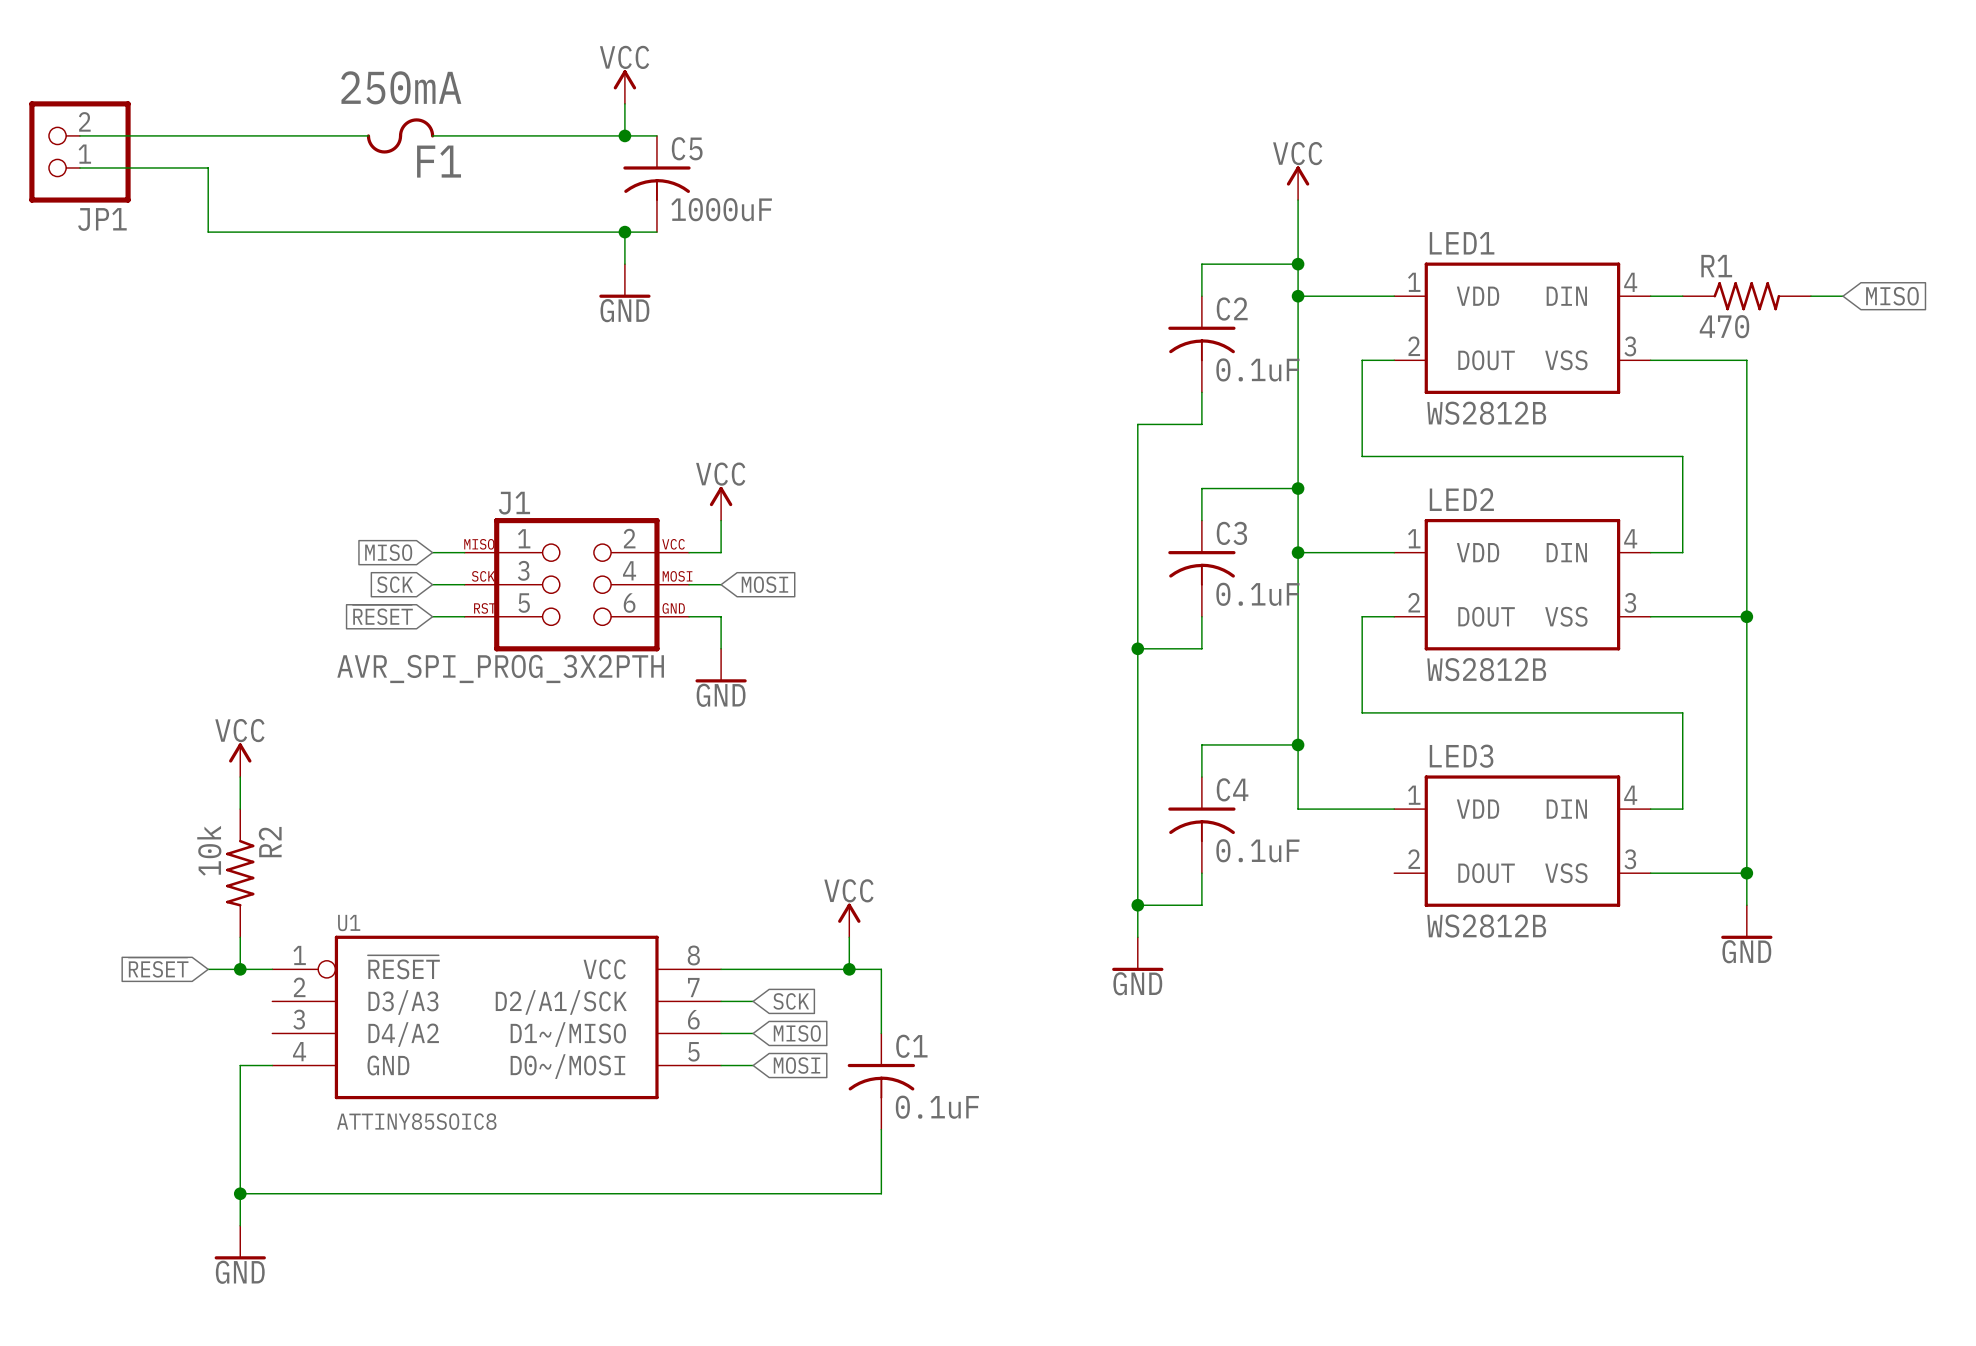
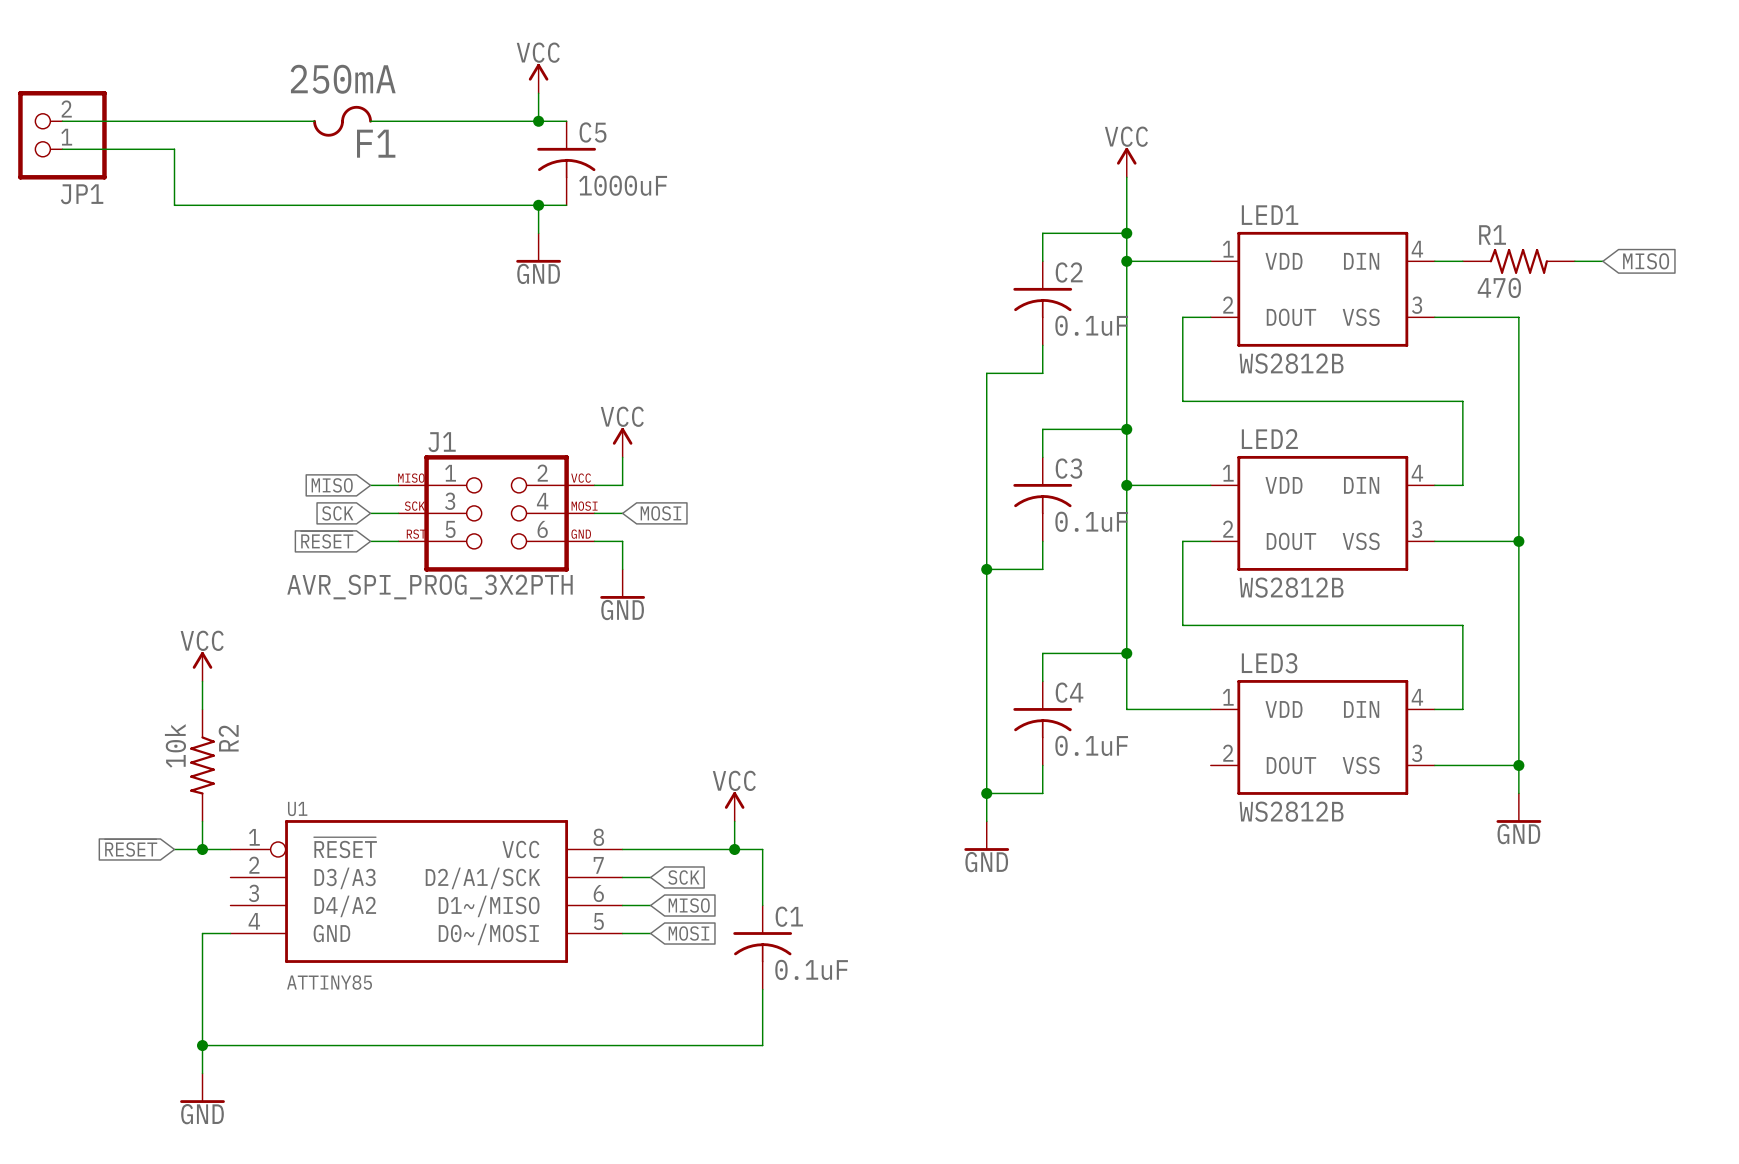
U1 value: ATTINY85SOIC8 (416, 1121) -> ATTINY85 (329, 982)

